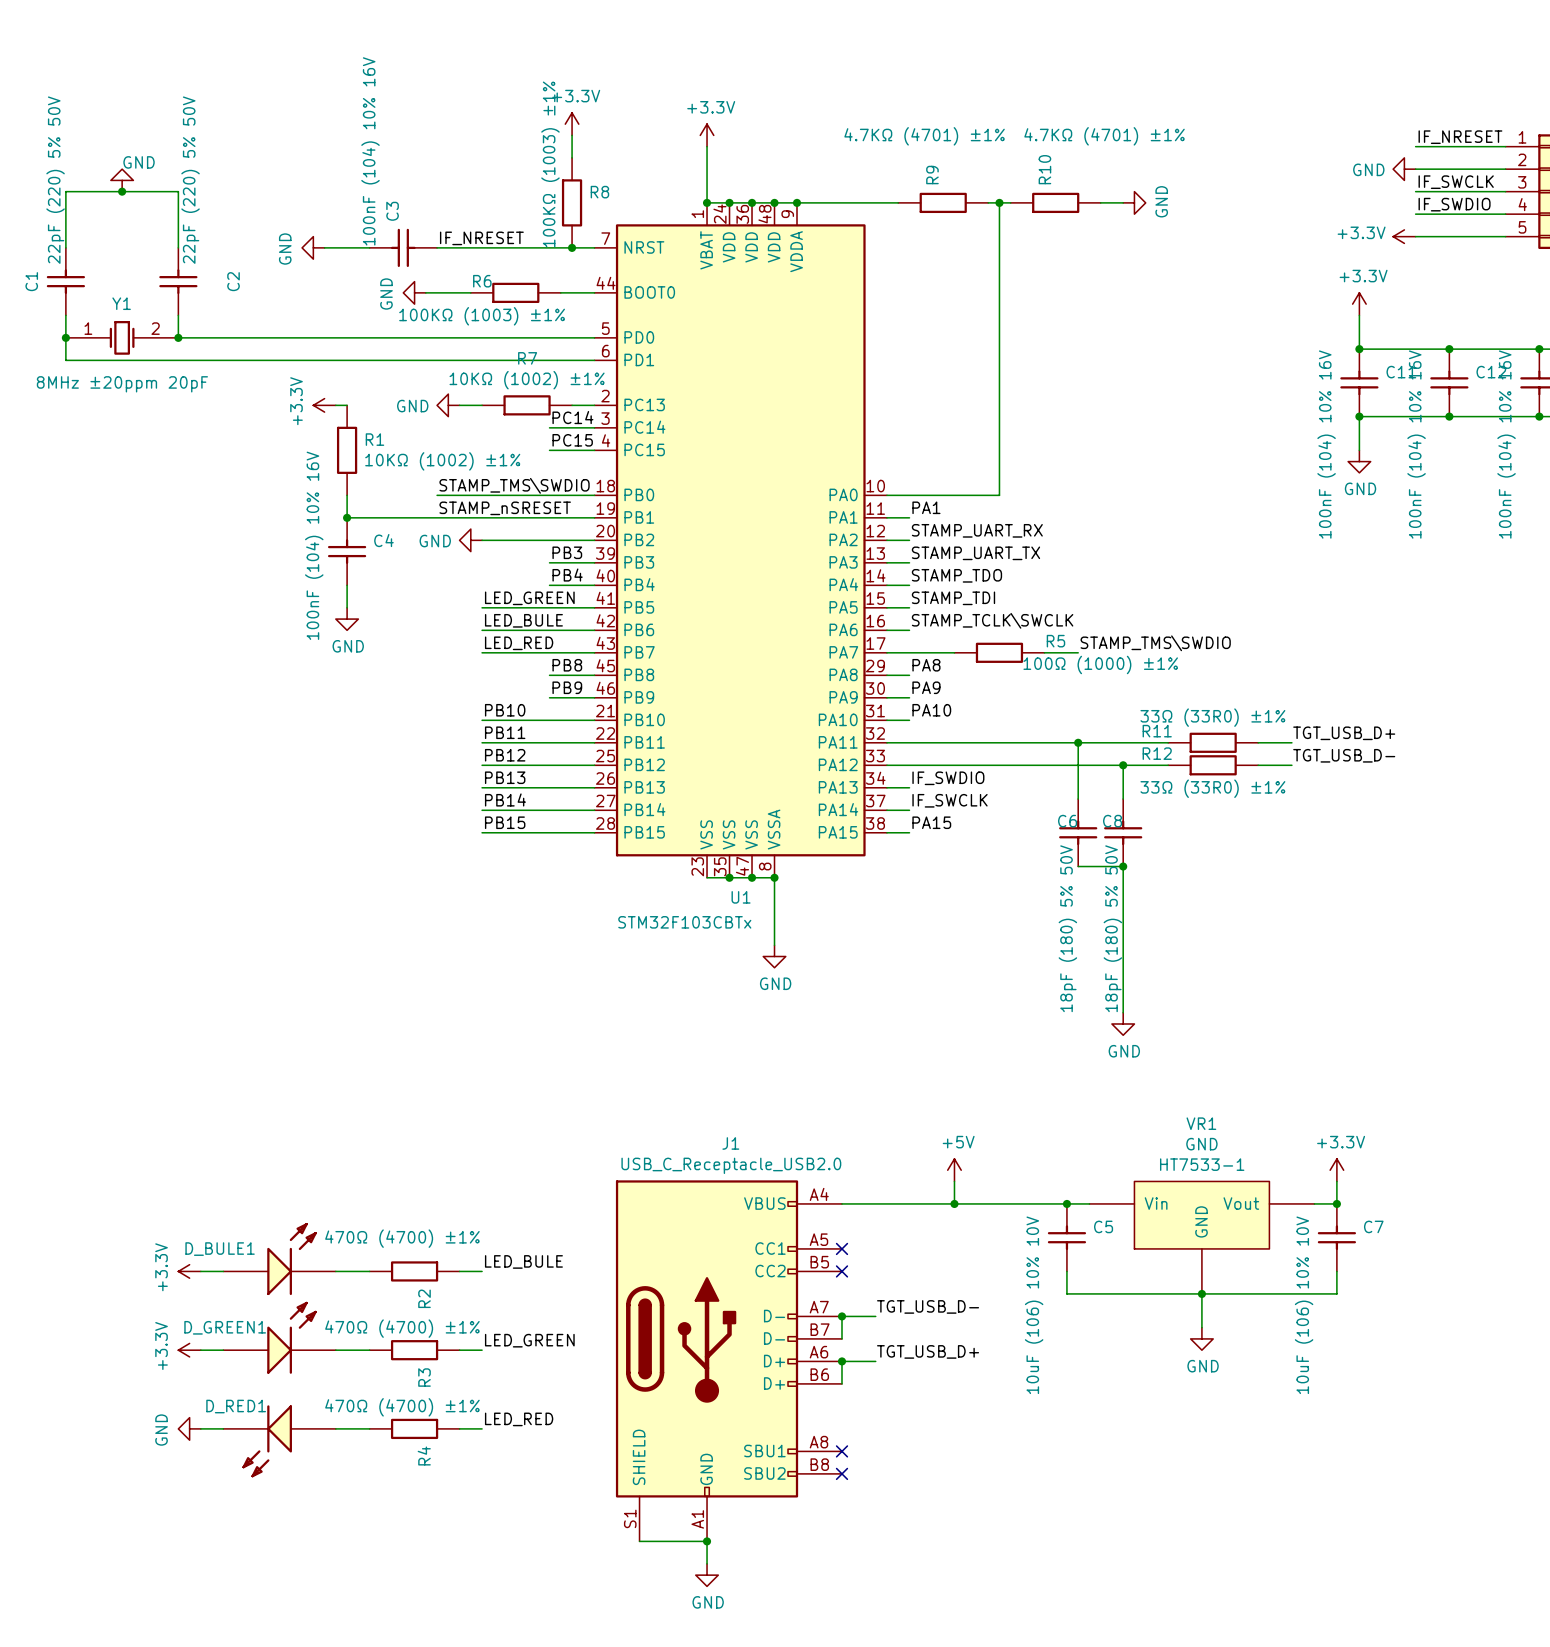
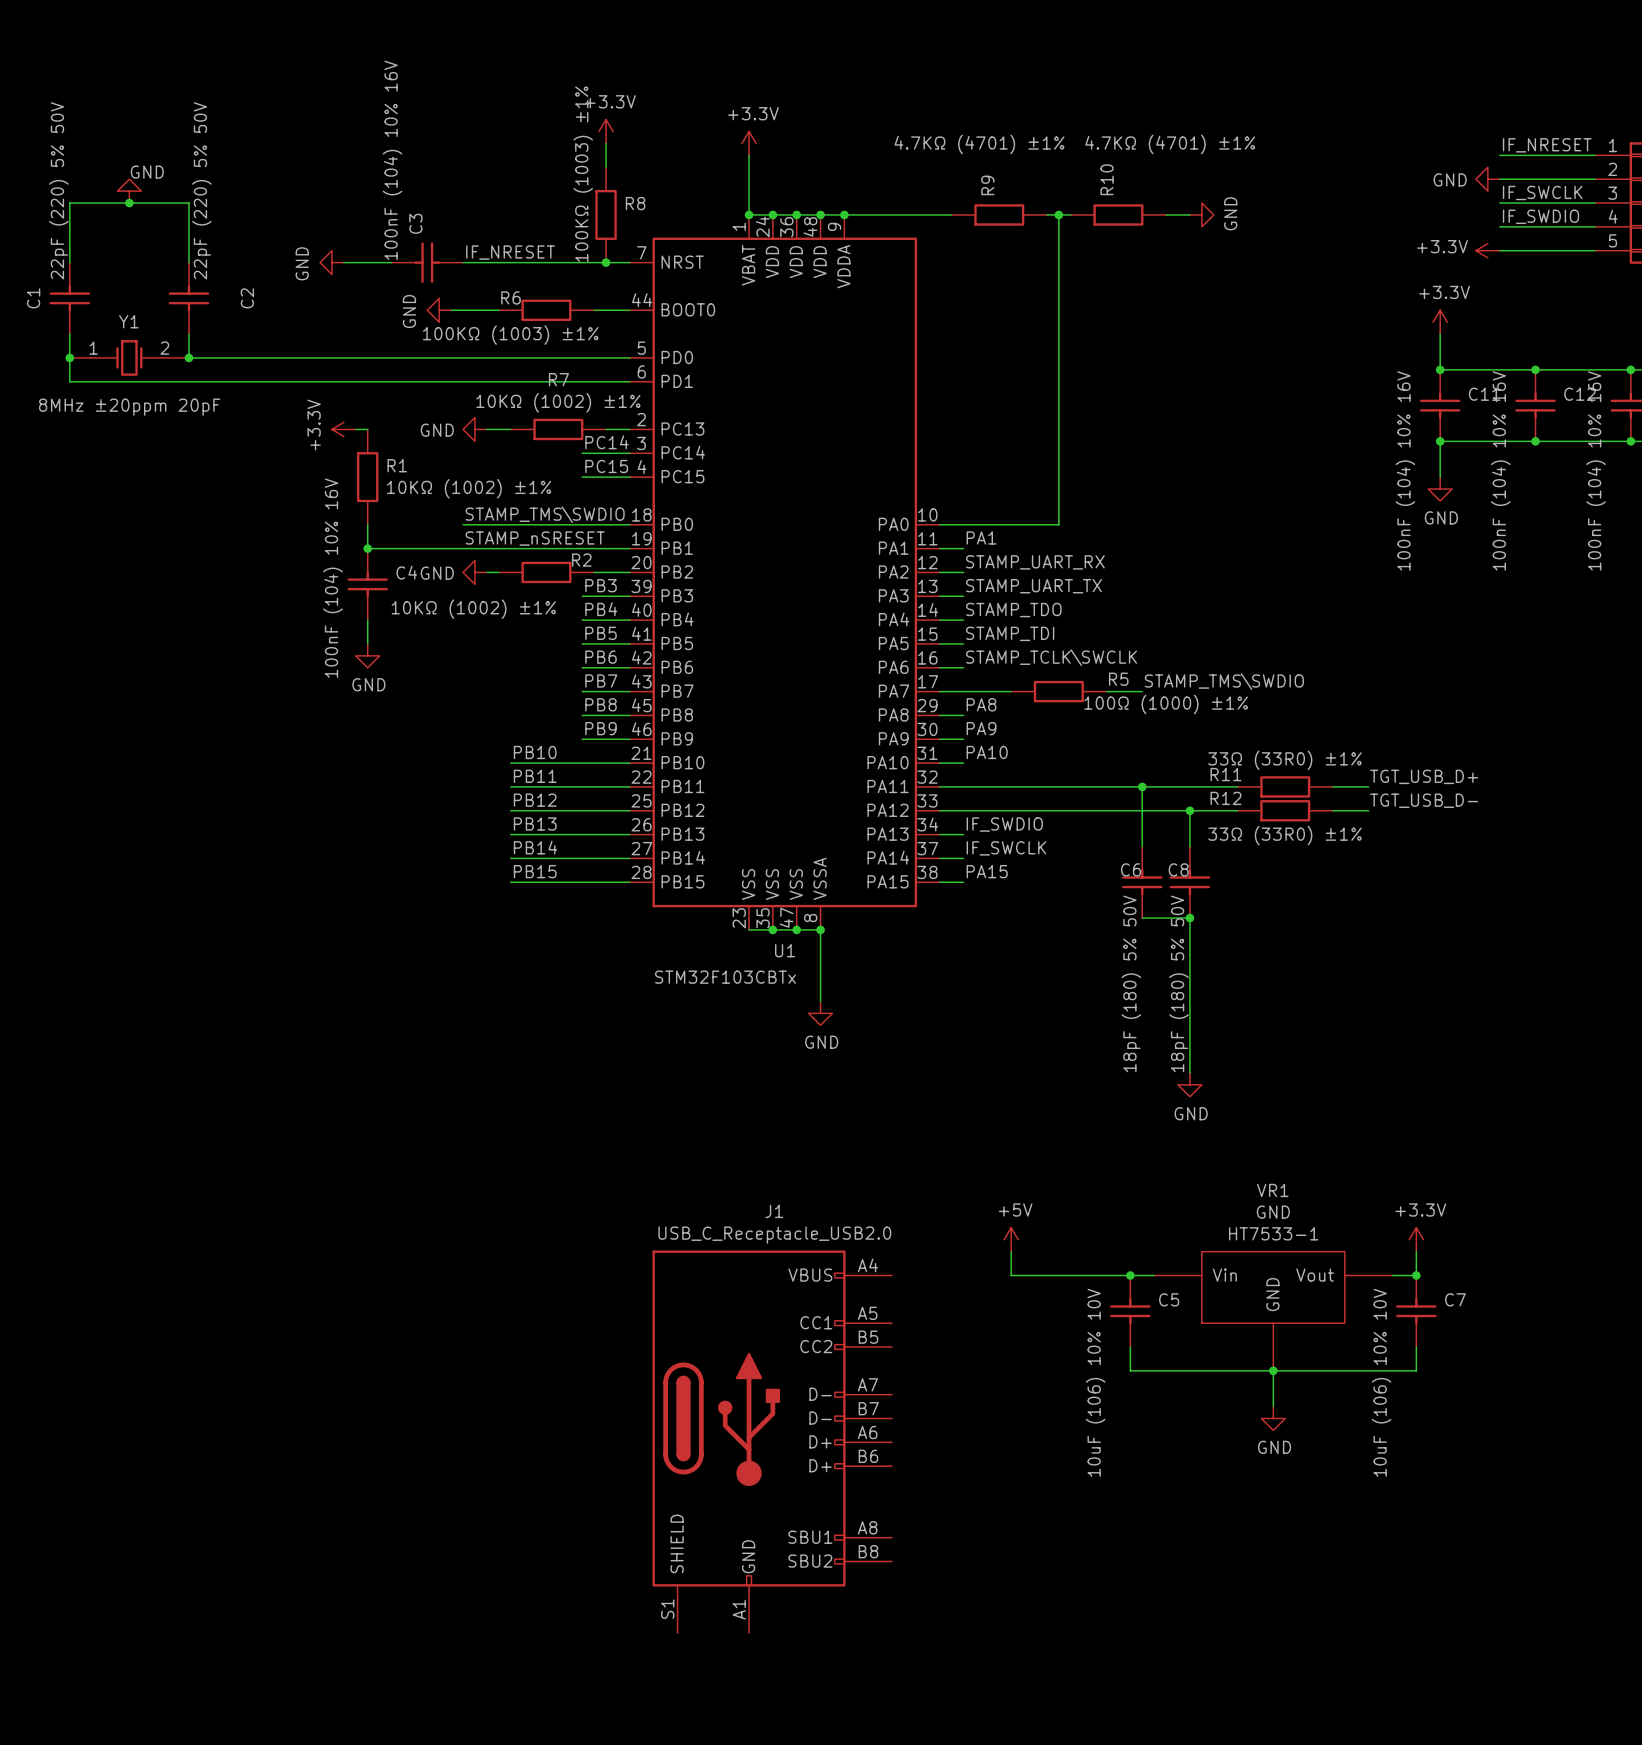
wire: none -> (486, 572) (498, 572)
power symbol position: GND (470, 540) -> GND (474, 572)
wire: (482, 540) (560, 540) -> none
label: none -> PB5 (601, 633)
label: LED_GREEN (529, 598) -> none
wire: (482, 607) (549, 607) -> none
label: LED_BULE (523, 620) -> none
label: none -> PB6 (601, 657)
wire: (482, 630) (549, 630) -> none
label: none -> PB7 (601, 680)
label: LED_RED (519, 643) -> none
wire: (482, 652) (549, 652) -> none
wire: (841, 1203) (954, 1203) -> none
junction: (954, 1203) -> none
R2 text: 470Ω (4700) ±1% (402, 1238) -> 10KΩ (1002) ±1% (473, 609)
no-connect mark: (841, 1248) -> none
D_BULE1: (279, 1259) -> none
label: LED_BULE (523, 1261) -> none
power symbol: +3.3V (189, 1271) -> none
wire: (200, 1271) (223, 1271) -> none
wire: (335, 1271) (369, 1271) -> none
R2 position: (414, 1271) -> (546, 572)
wire: (459, 1271) (482, 1271) -> none
no-connect mark: (841, 1271) -> none
R2 name rotation: 0° (424, 1298) -> 90° clockwise (581, 560)
R2 name position: R2 (424, 1298) -> R2 (581, 560)
label: TGT_USB_D- (928, 1306) -> none
junction: (841, 1316) -> none
wire: (875, 1316) (841, 1316) (841, 1338) -> none
D_GREEN1: (279, 1337) -> none
label: LED_GREEN (529, 1340) -> none
power symbol: +3.3V (189, 1350) -> none
wire: (200, 1350) (223, 1350) -> none
wire: (335, 1350) (369, 1350) -> none
R3: (414, 1350) -> none
wire: (459, 1350) (482, 1350) -> none
label: TGT_USB_D+ (928, 1351) -> none
junction: (841, 1361) -> none
wire: (875, 1361) (841, 1361) (841, 1383) -> none
label: LED_RED (519, 1419) -> none
power symbol: GND (189, 1428) -> none
wire: (200, 1428) (223, 1428) -> none
wire: (335, 1428) (369, 1428) -> none
R4: (414, 1428) -> none
wire: (459, 1428) (482, 1428) -> none
D_RED1: (279, 1441) -> none
no-connect mark: (841, 1451) -> none
no-connect mark: (841, 1473) -> none
wire: (639, 1541) (707, 1541) (707, 1563) -> none
junction: (707, 1541) -> none
power symbol: GND (707, 1575) -> none

